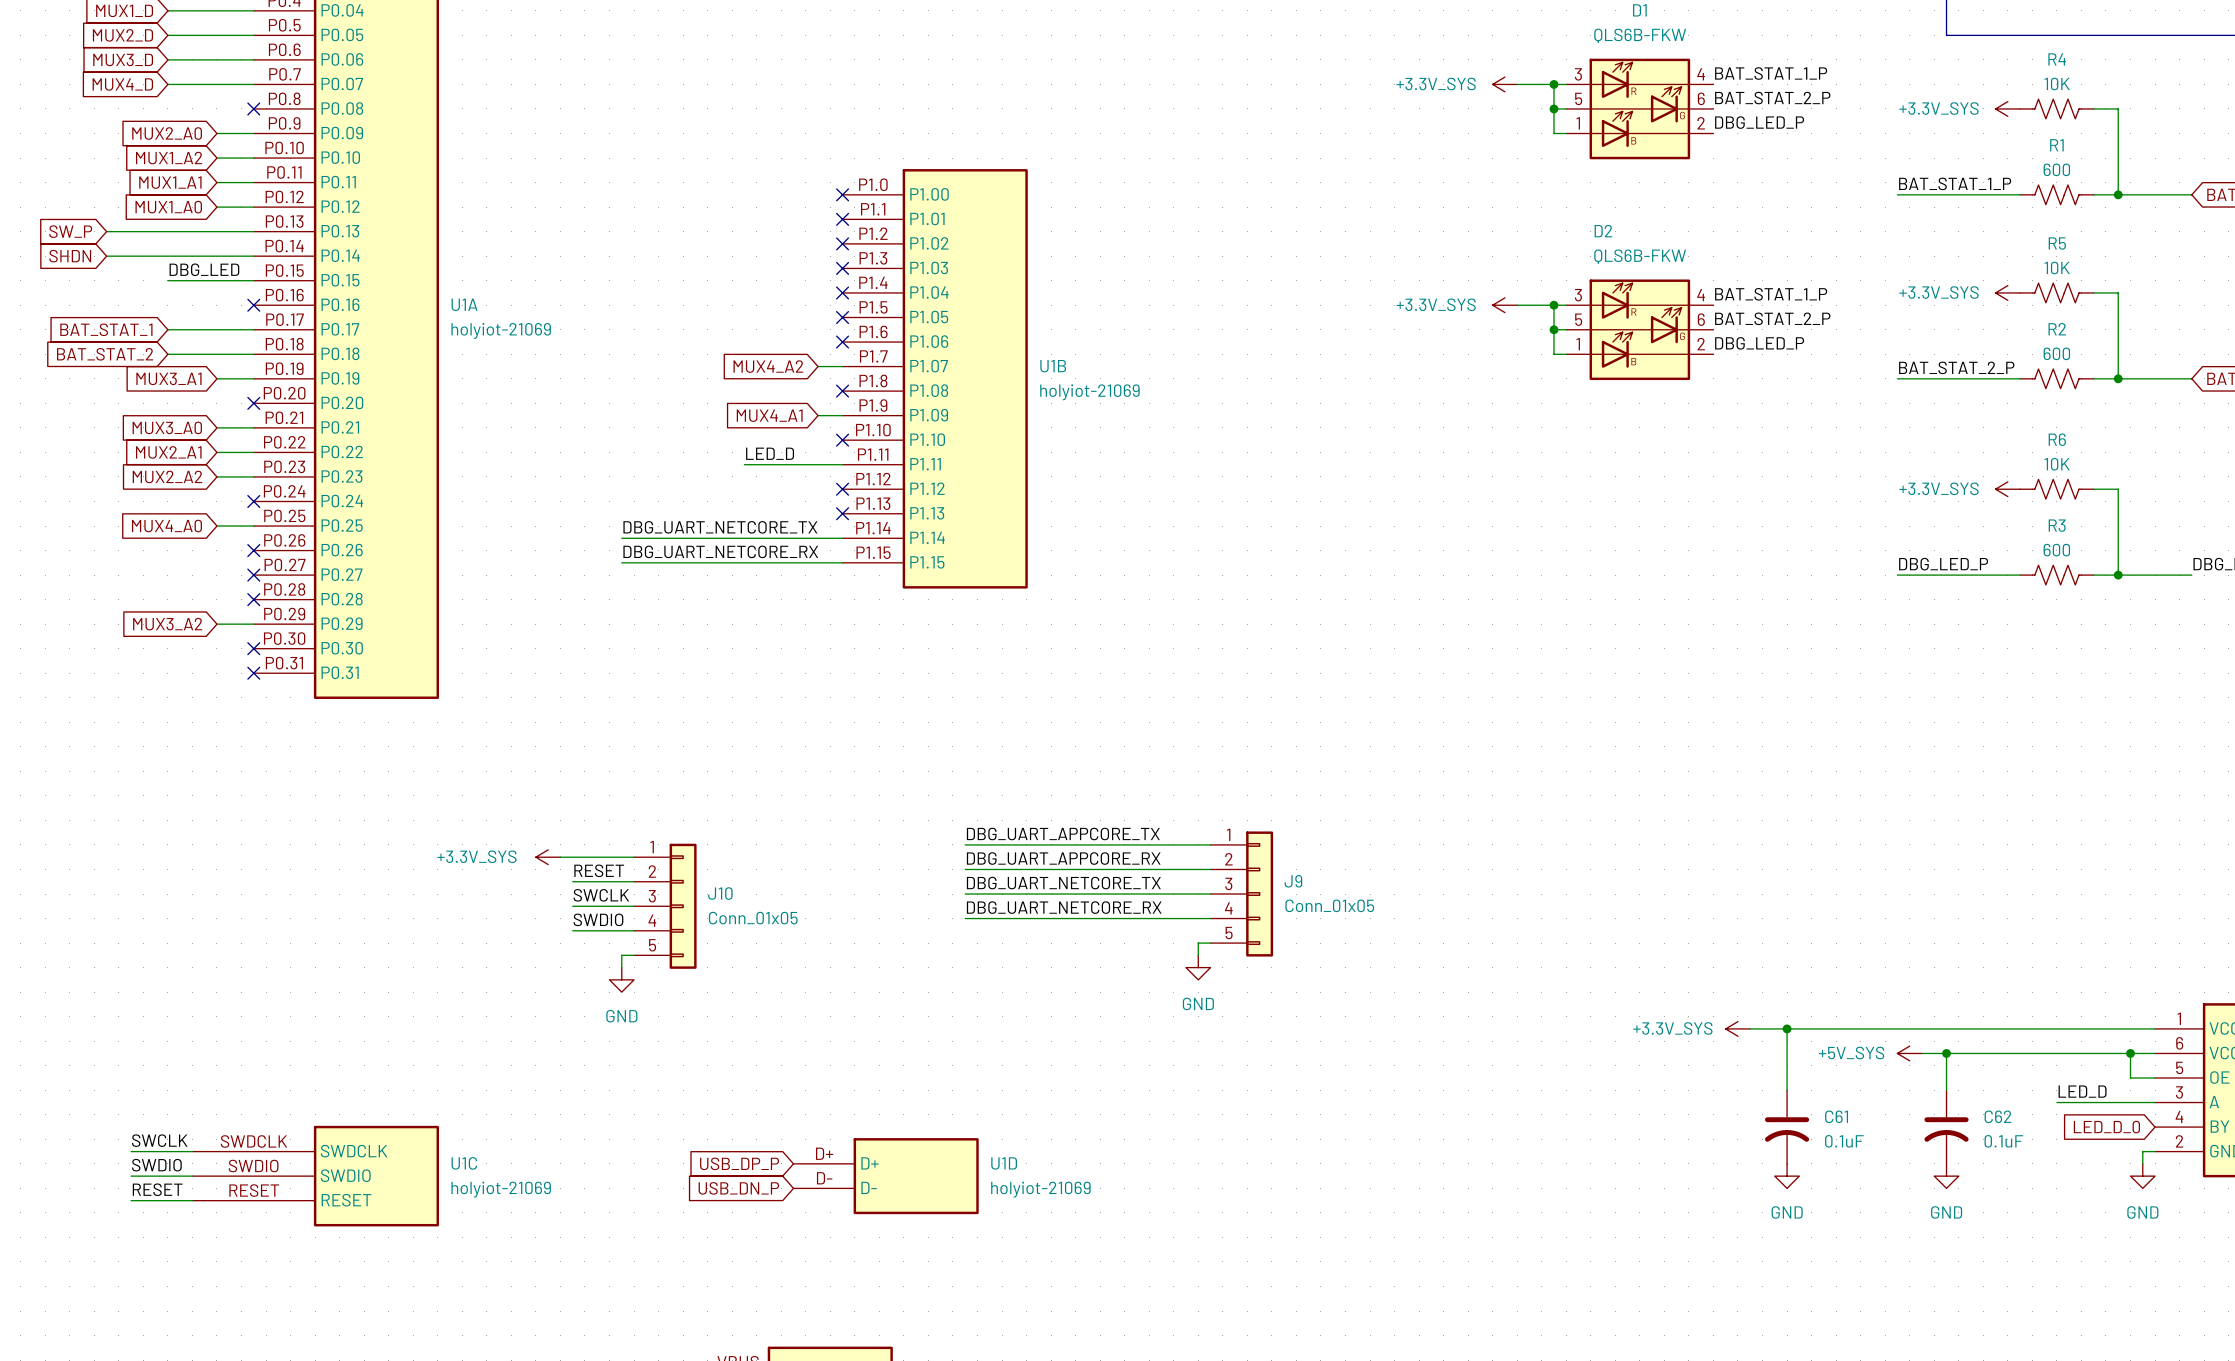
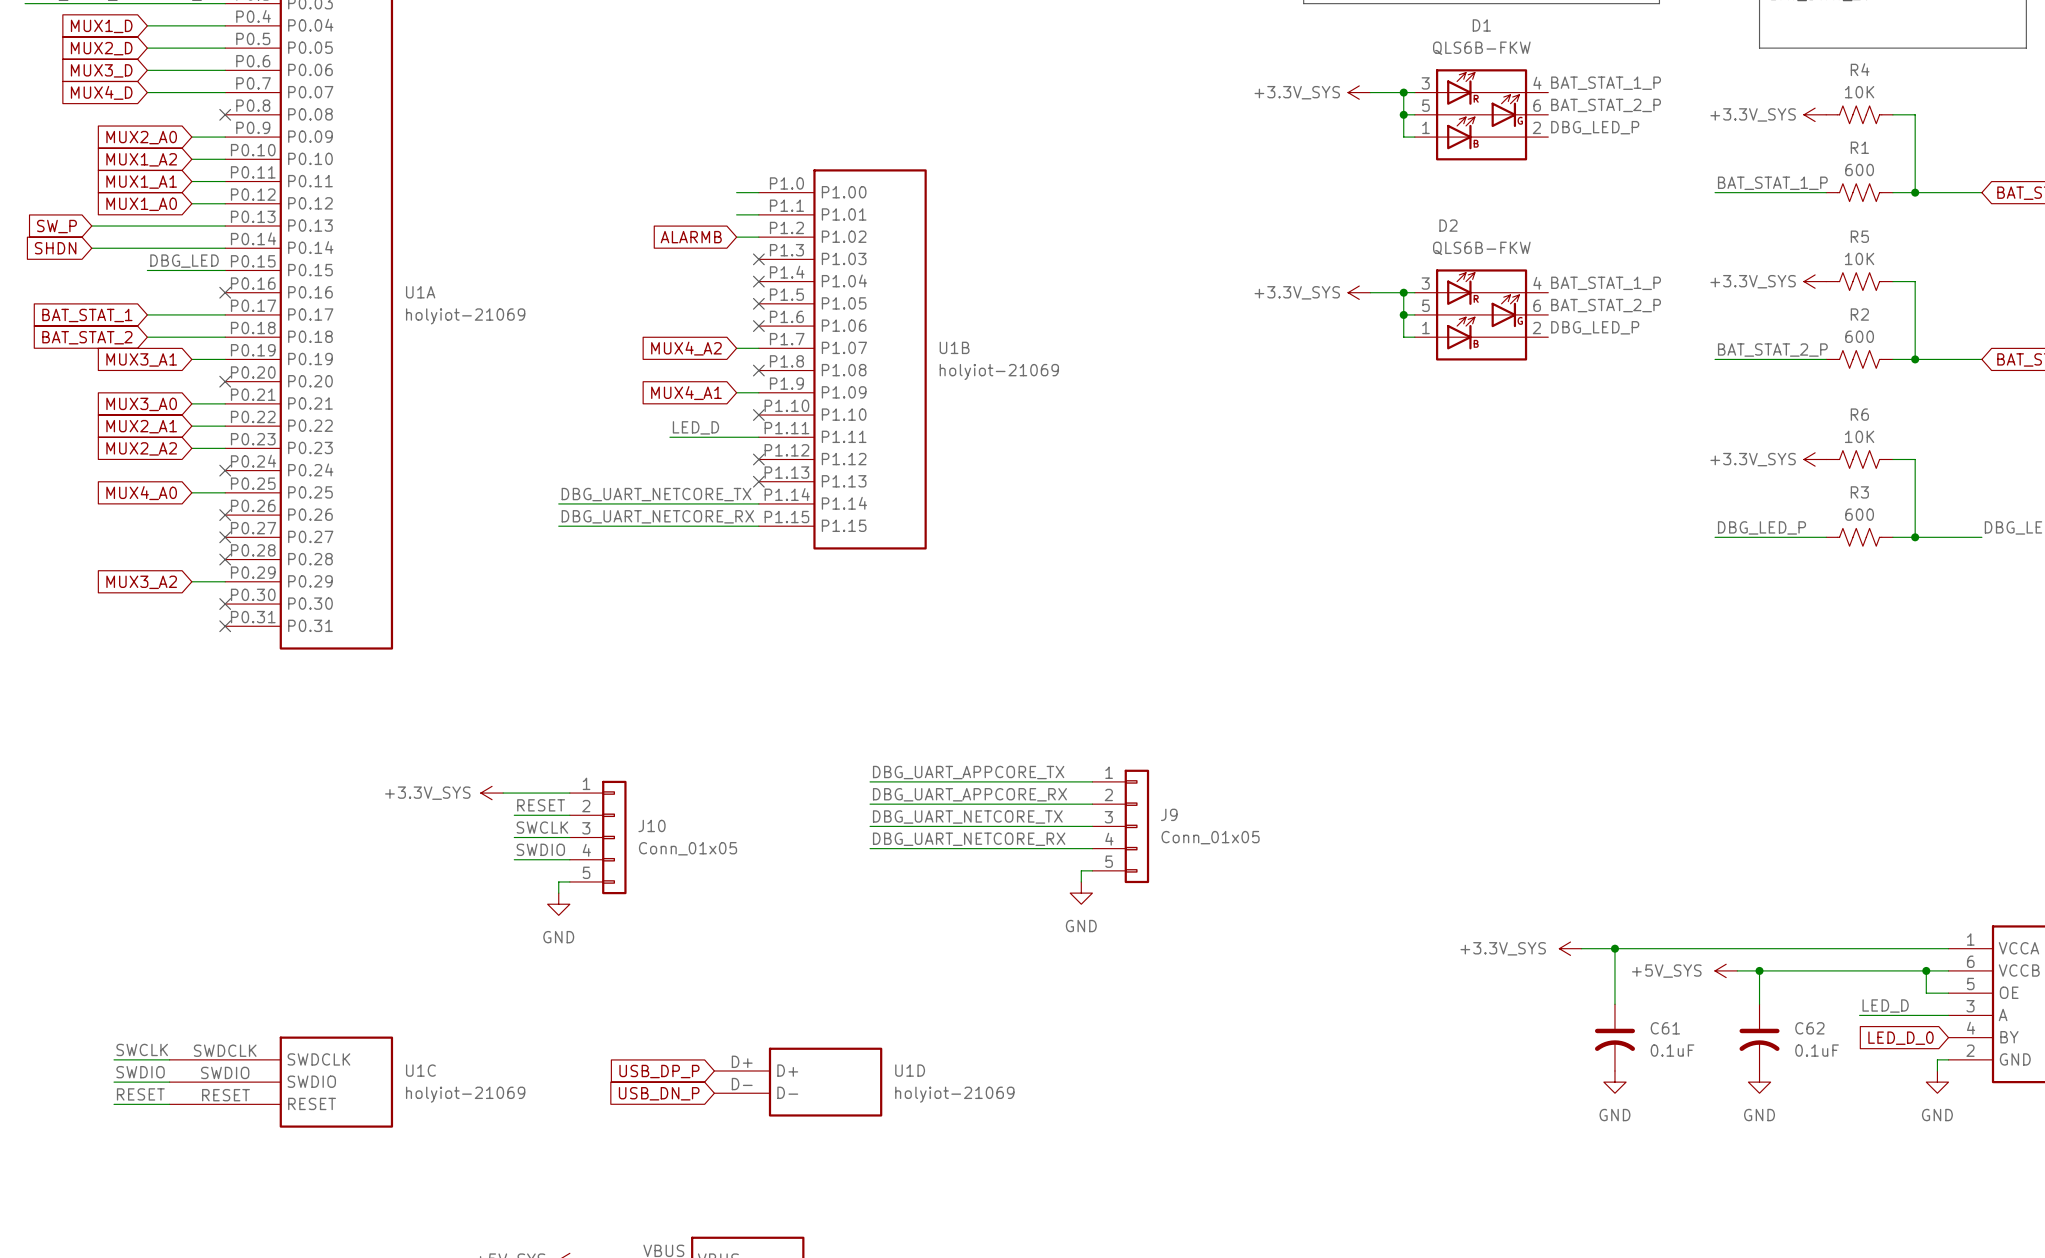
wire: none -> (736, 192) (758, 192)
no-connect mark: (842, 194) -> none
wire: none -> (736, 214) (758, 214)
no-connect mark: (842, 219) -> none
global label: none -> ALARMB (691, 237)
wire: none -> (736, 237) (758, 237)
no-connect mark: (842, 243) -> none

